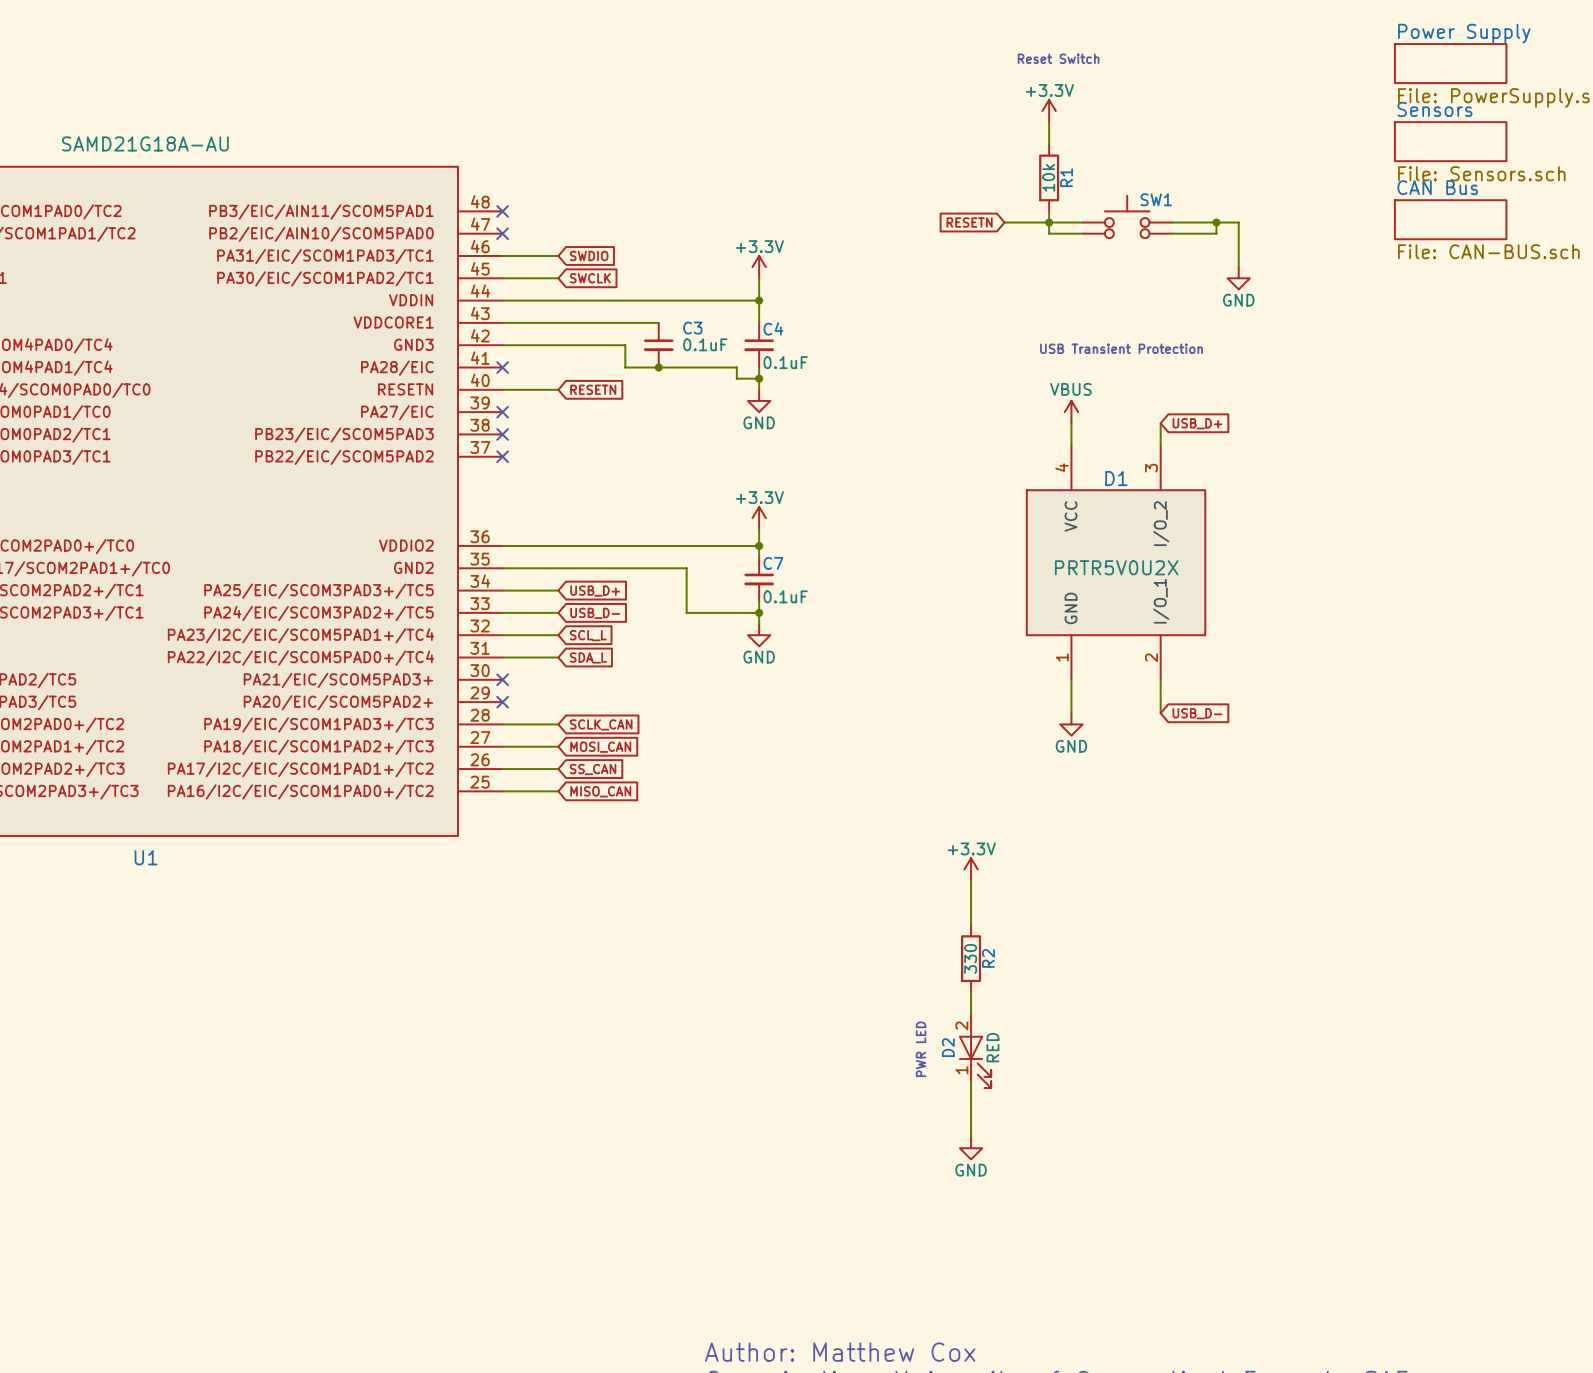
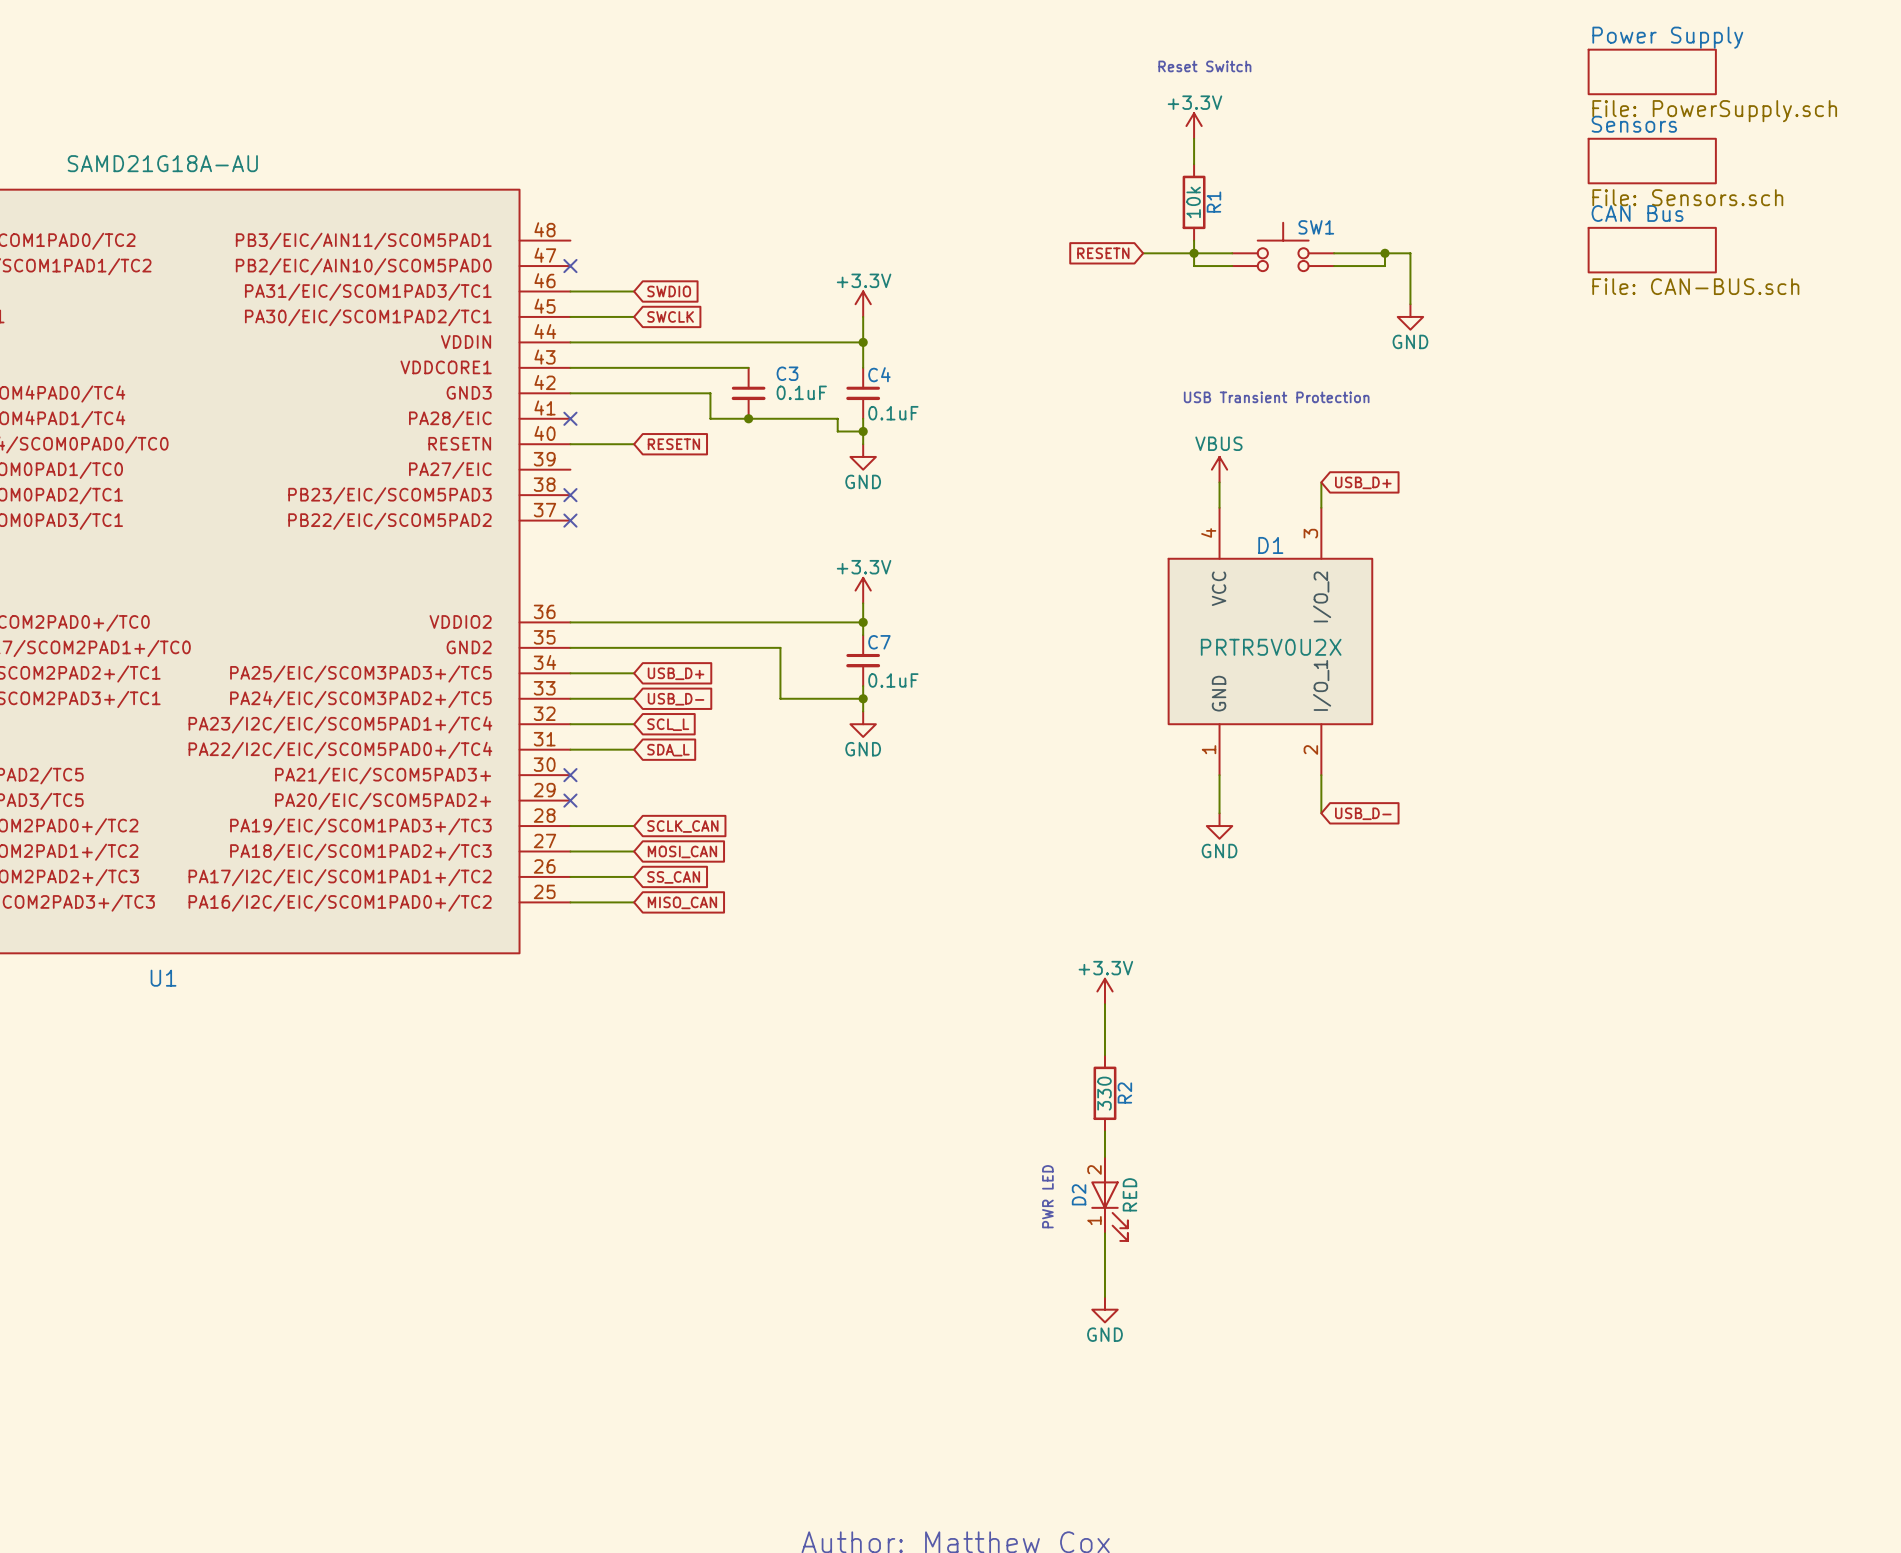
no-connect mark: (502, 211) -> none
no-connect mark: (502, 412) -> none

